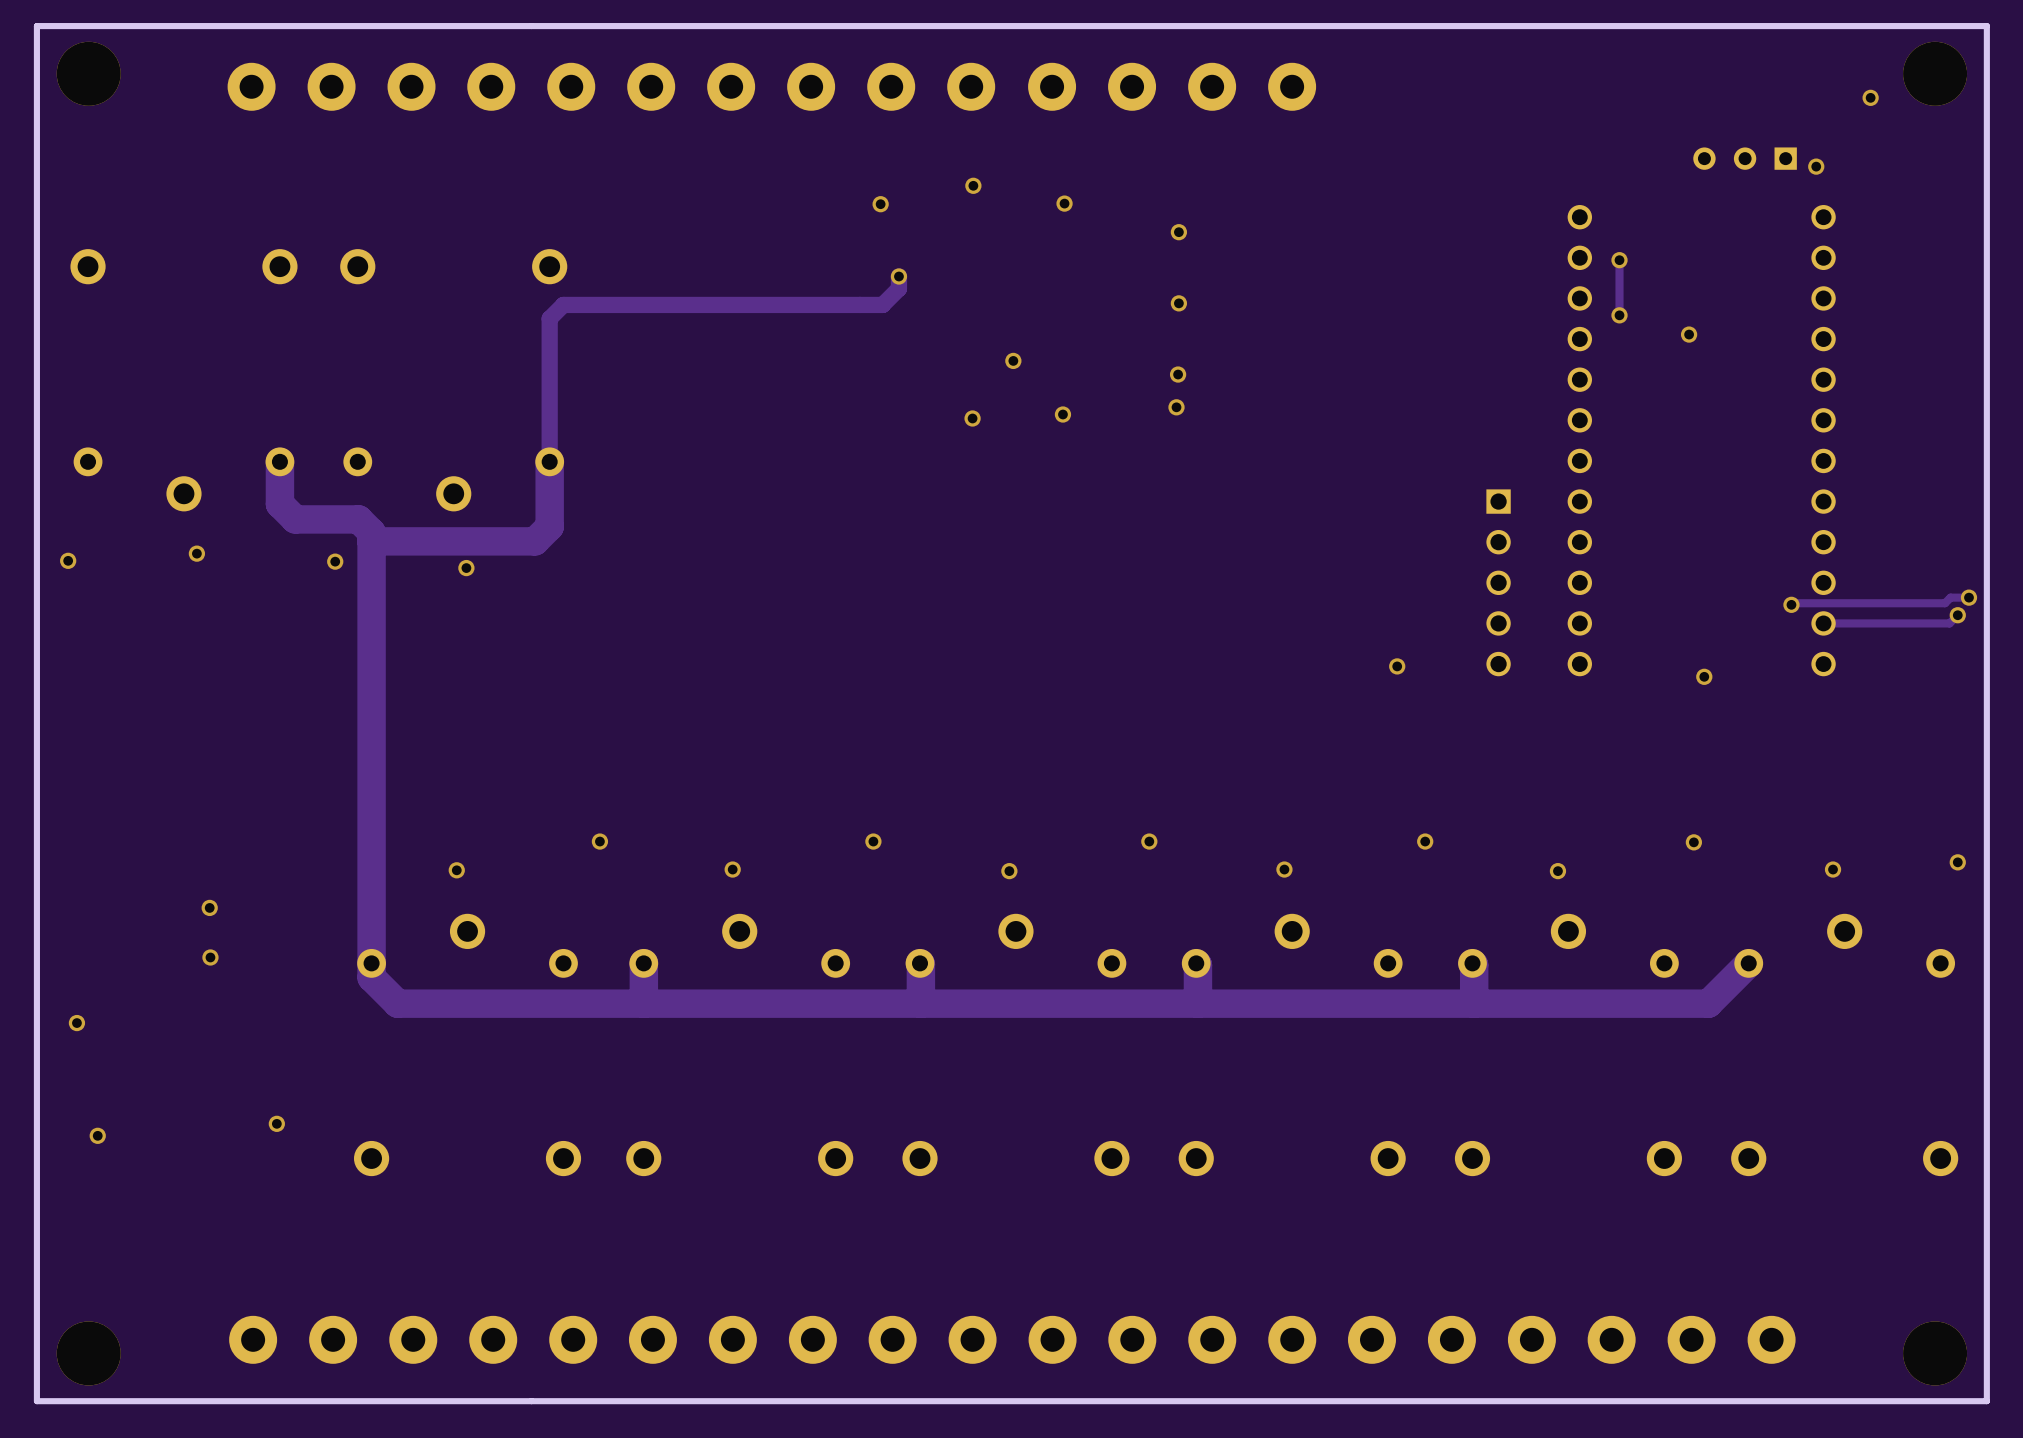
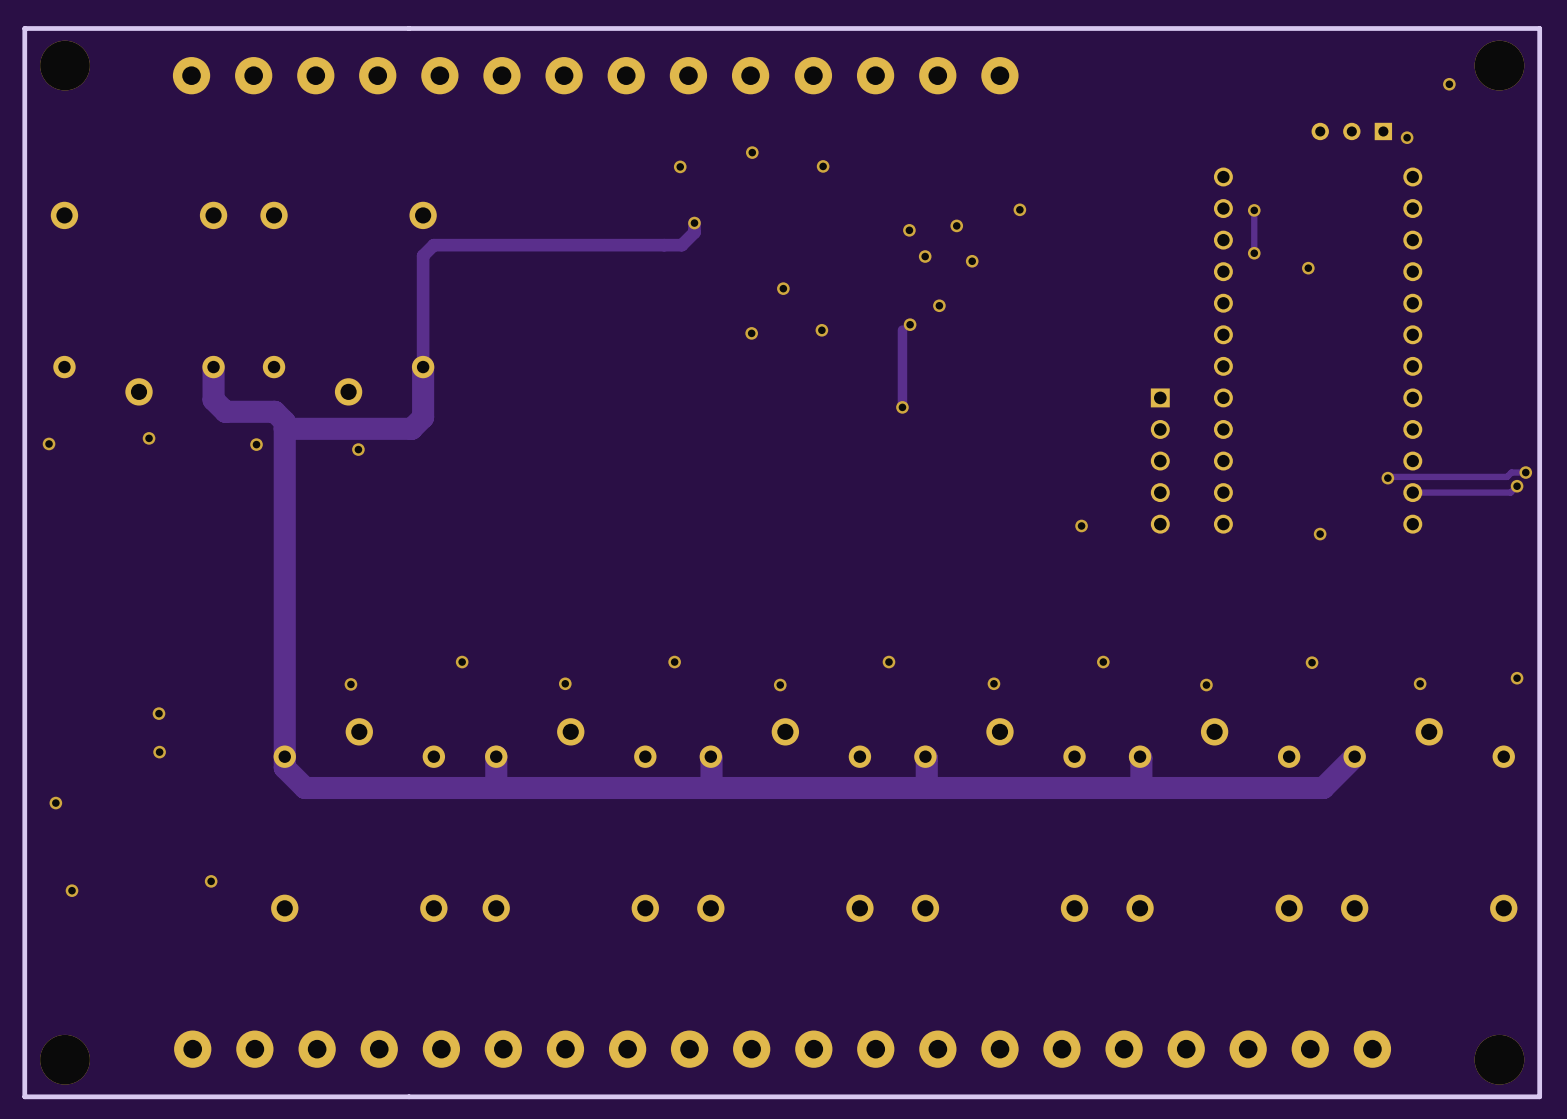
via: (1178, 232) -> none
via: none -> (1019, 209)
via: none -> (956, 225)
via: none -> (909, 230)
via: (1178, 303) -> none
via: none -> (925, 256)
via: none -> (972, 261)
via: (1178, 374) -> none
via: none -> (939, 305)
track: none -> (902, 330) (902, 407)
via: none -> (902, 407)

